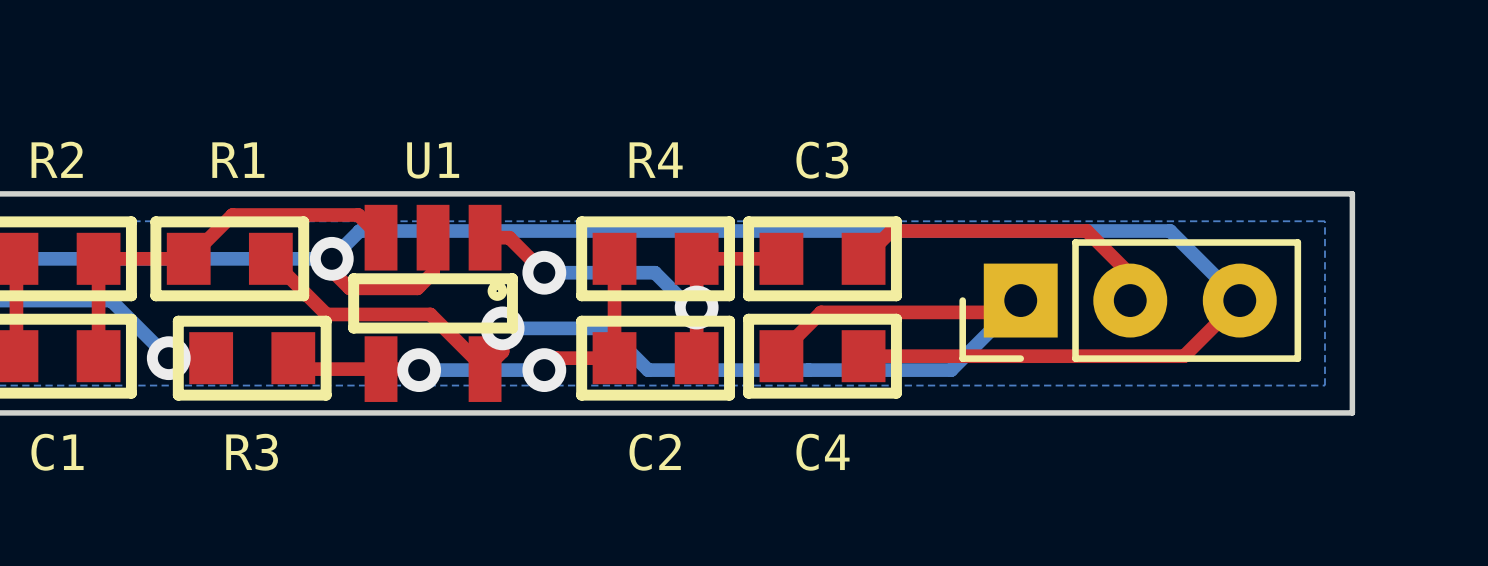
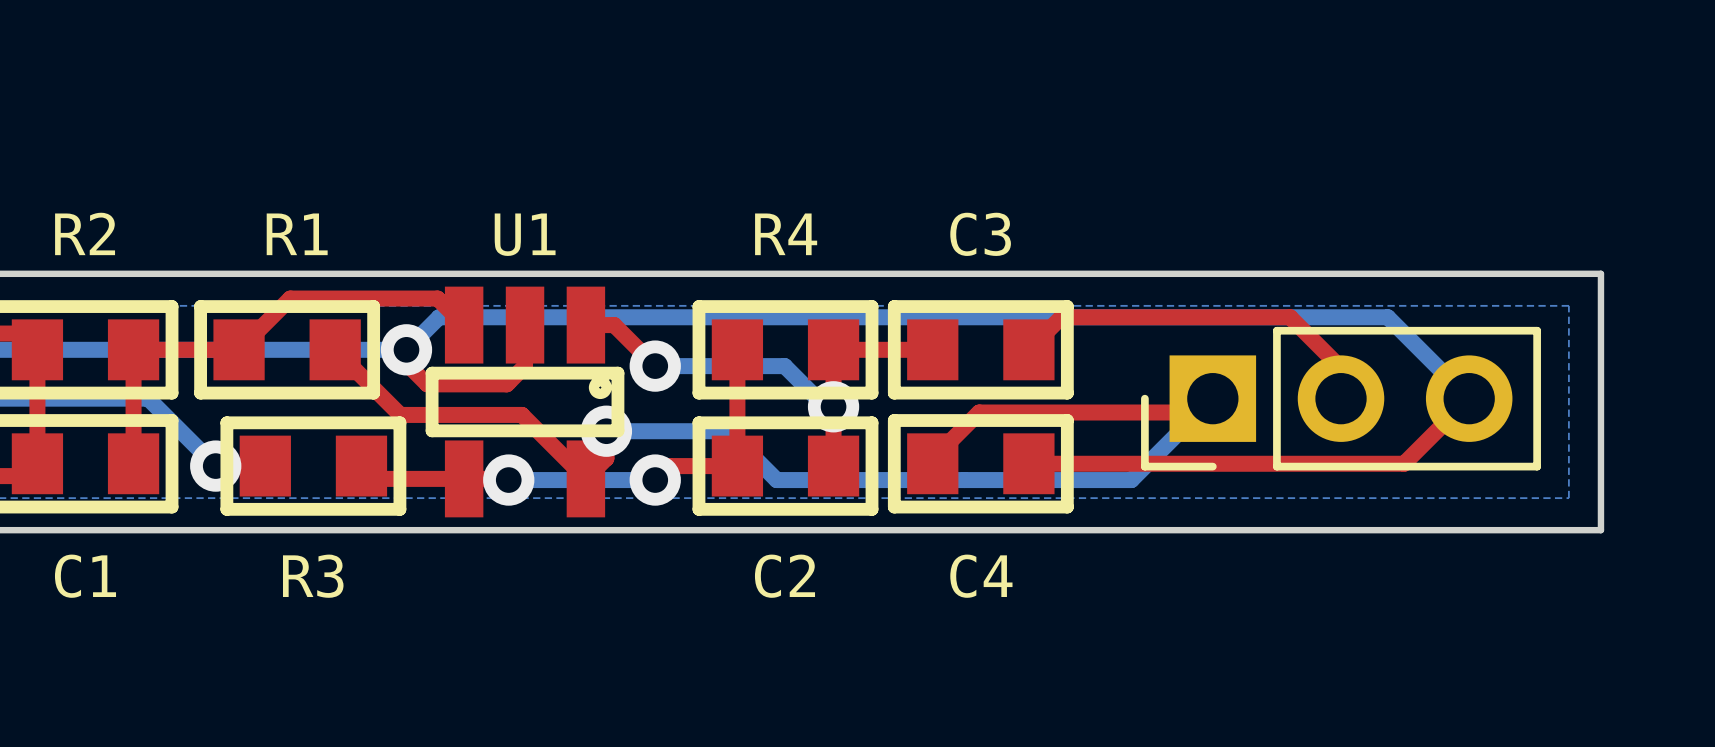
part footprint: [959, 239, 1302, 362] -> [1141, 326, 1541, 471]

